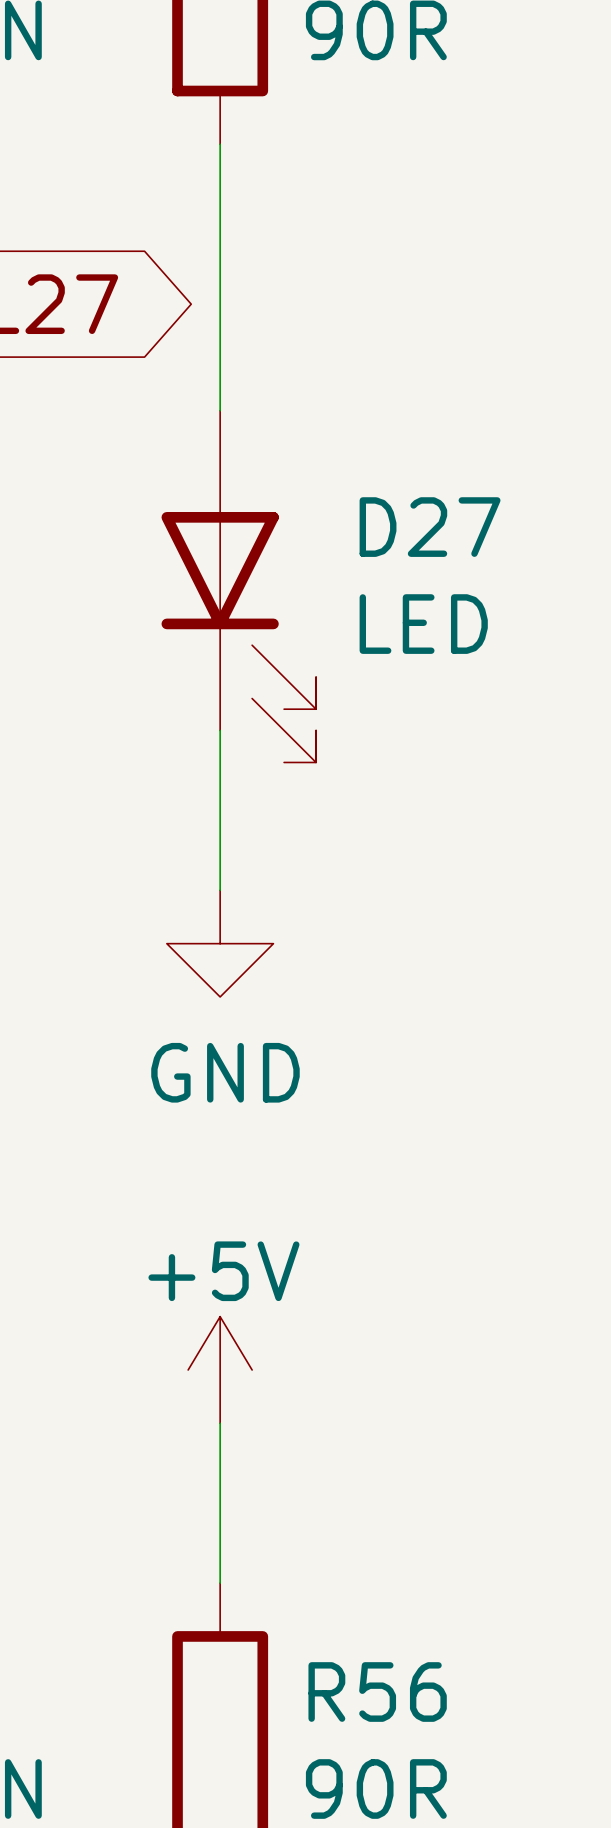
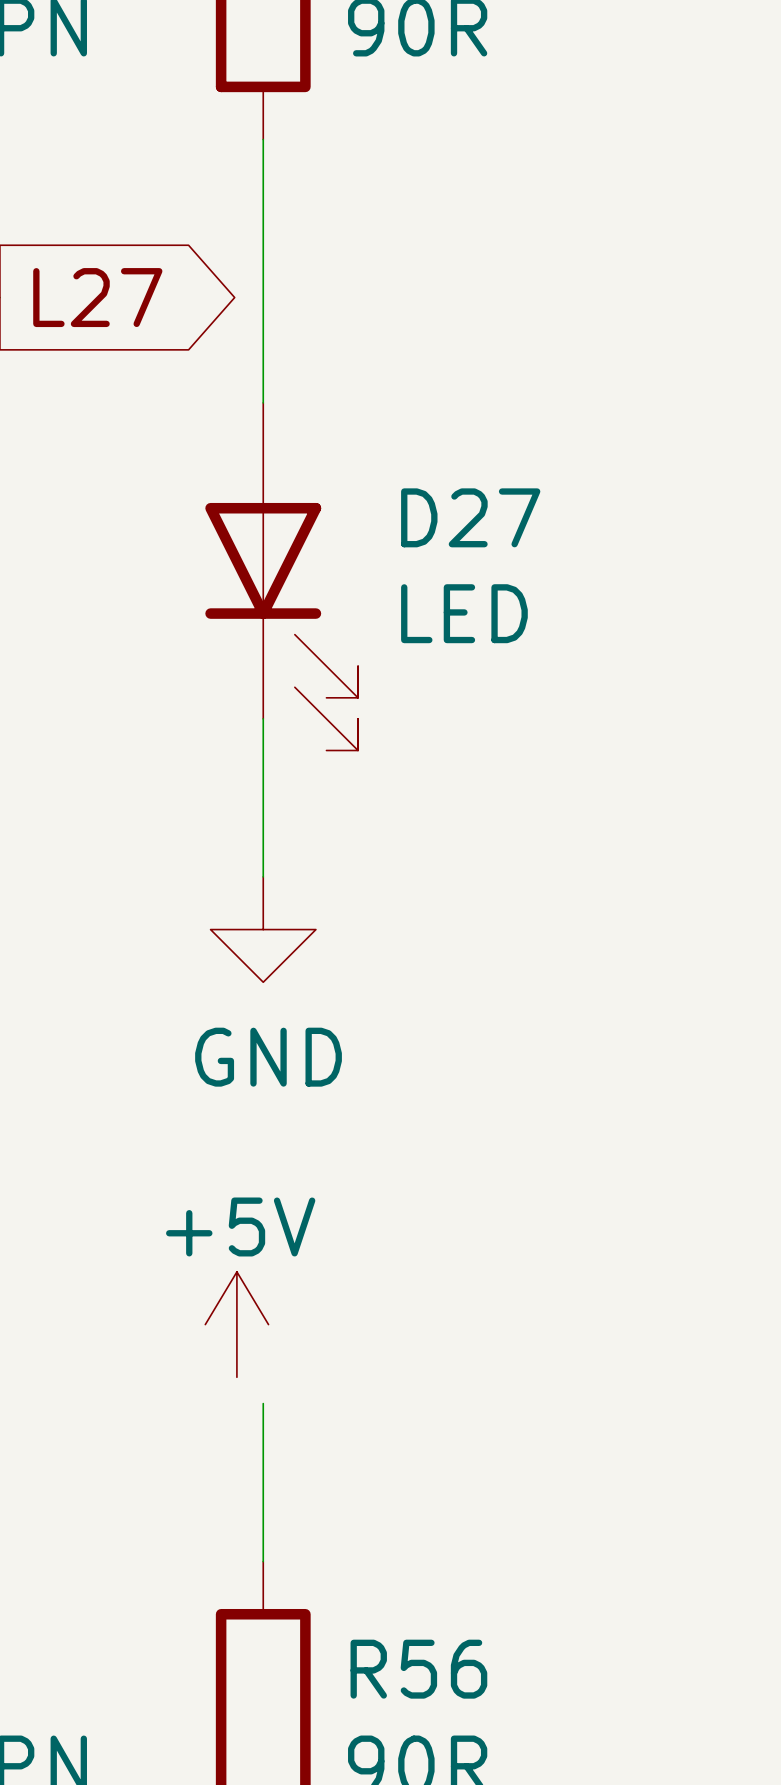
power symbol position: +5V (220, 1369) -> +5V (236, 1324)

